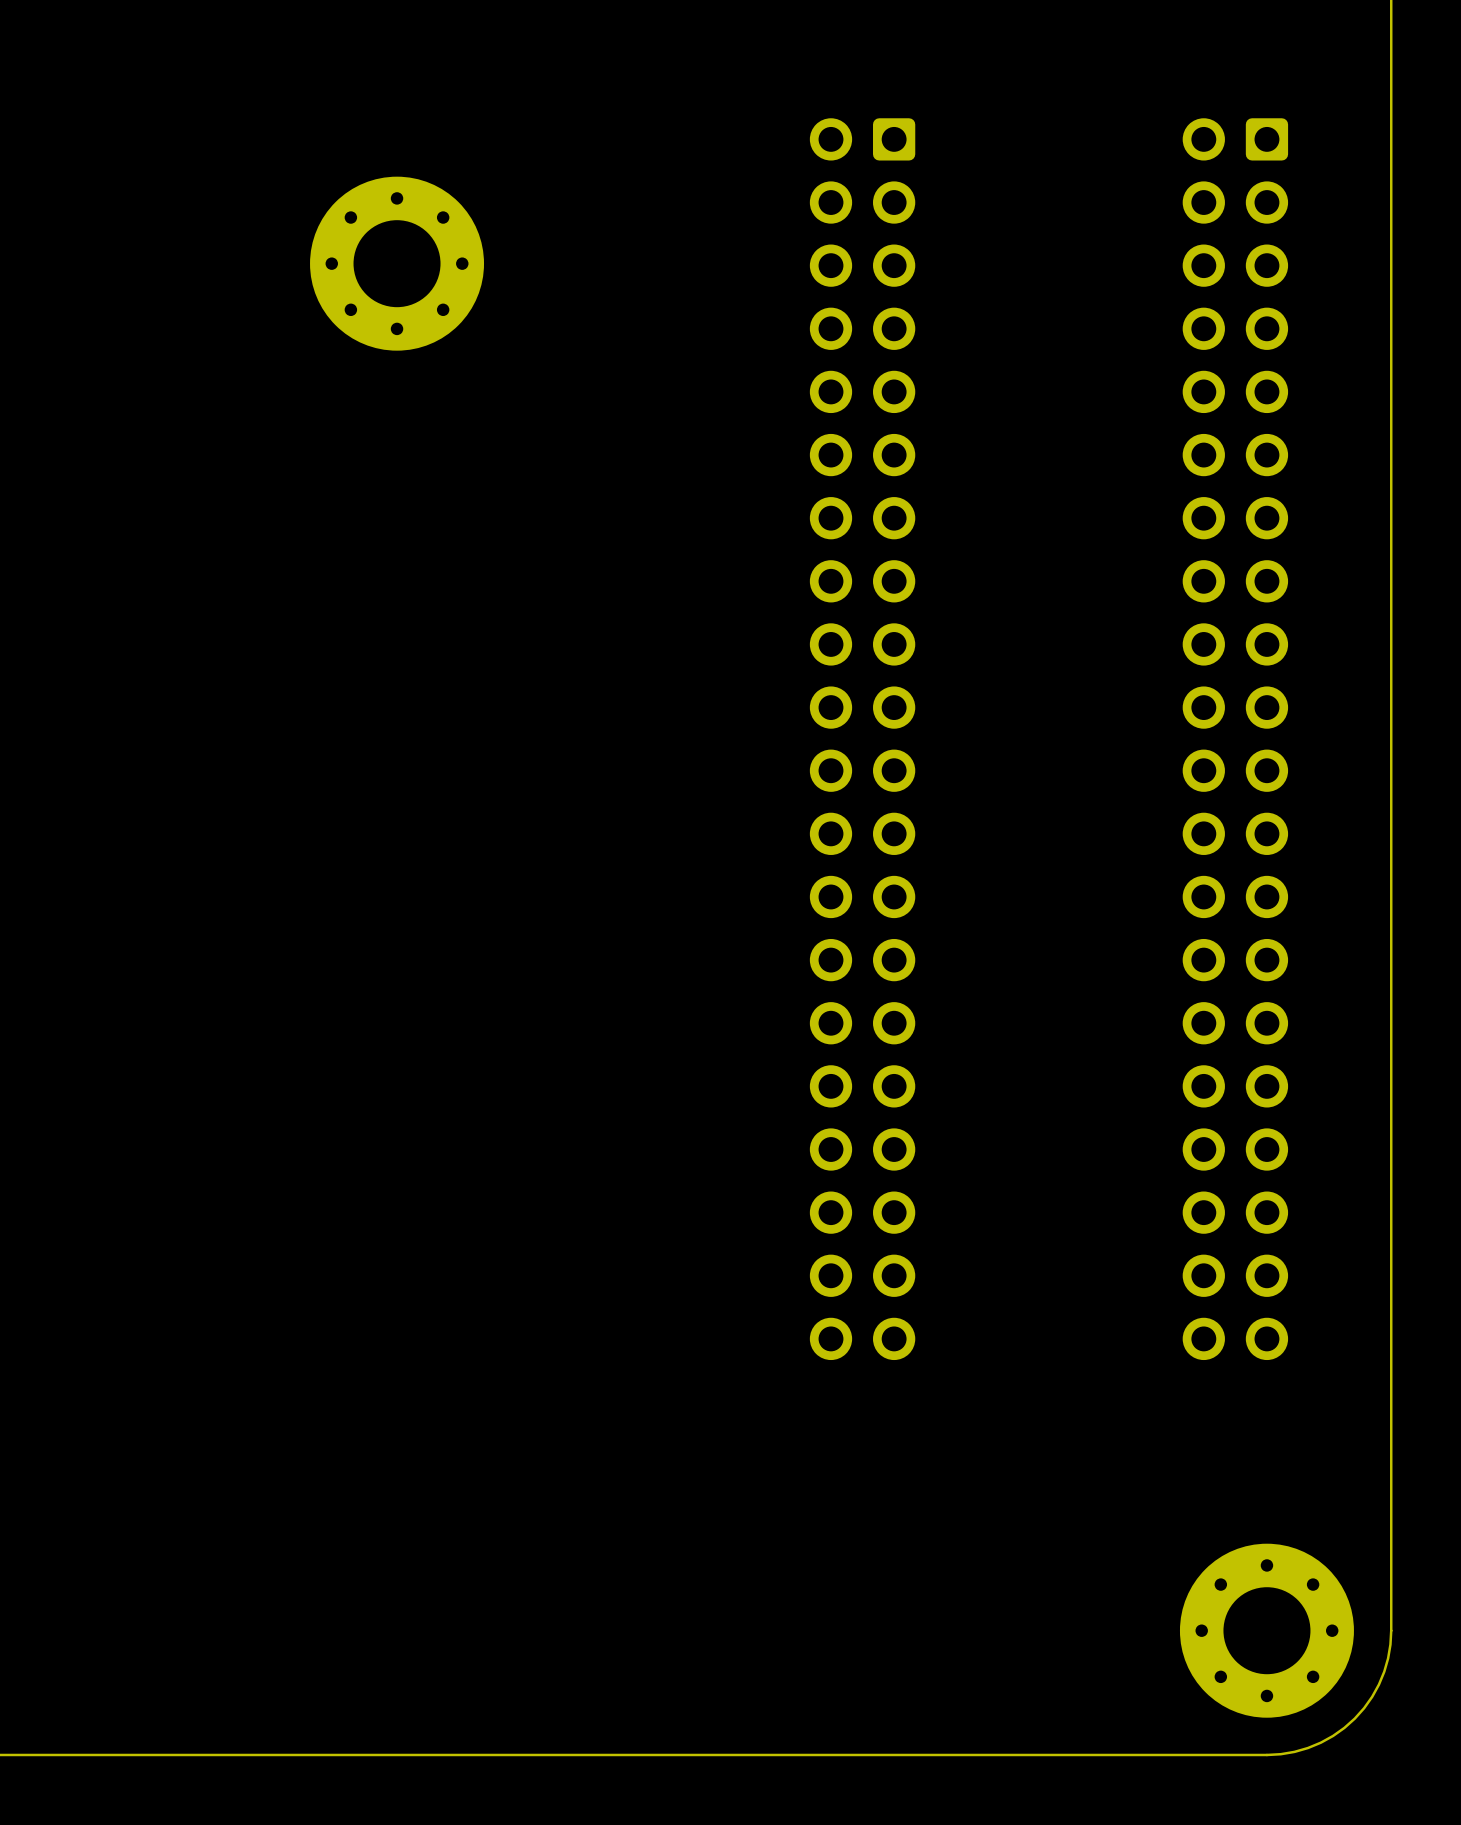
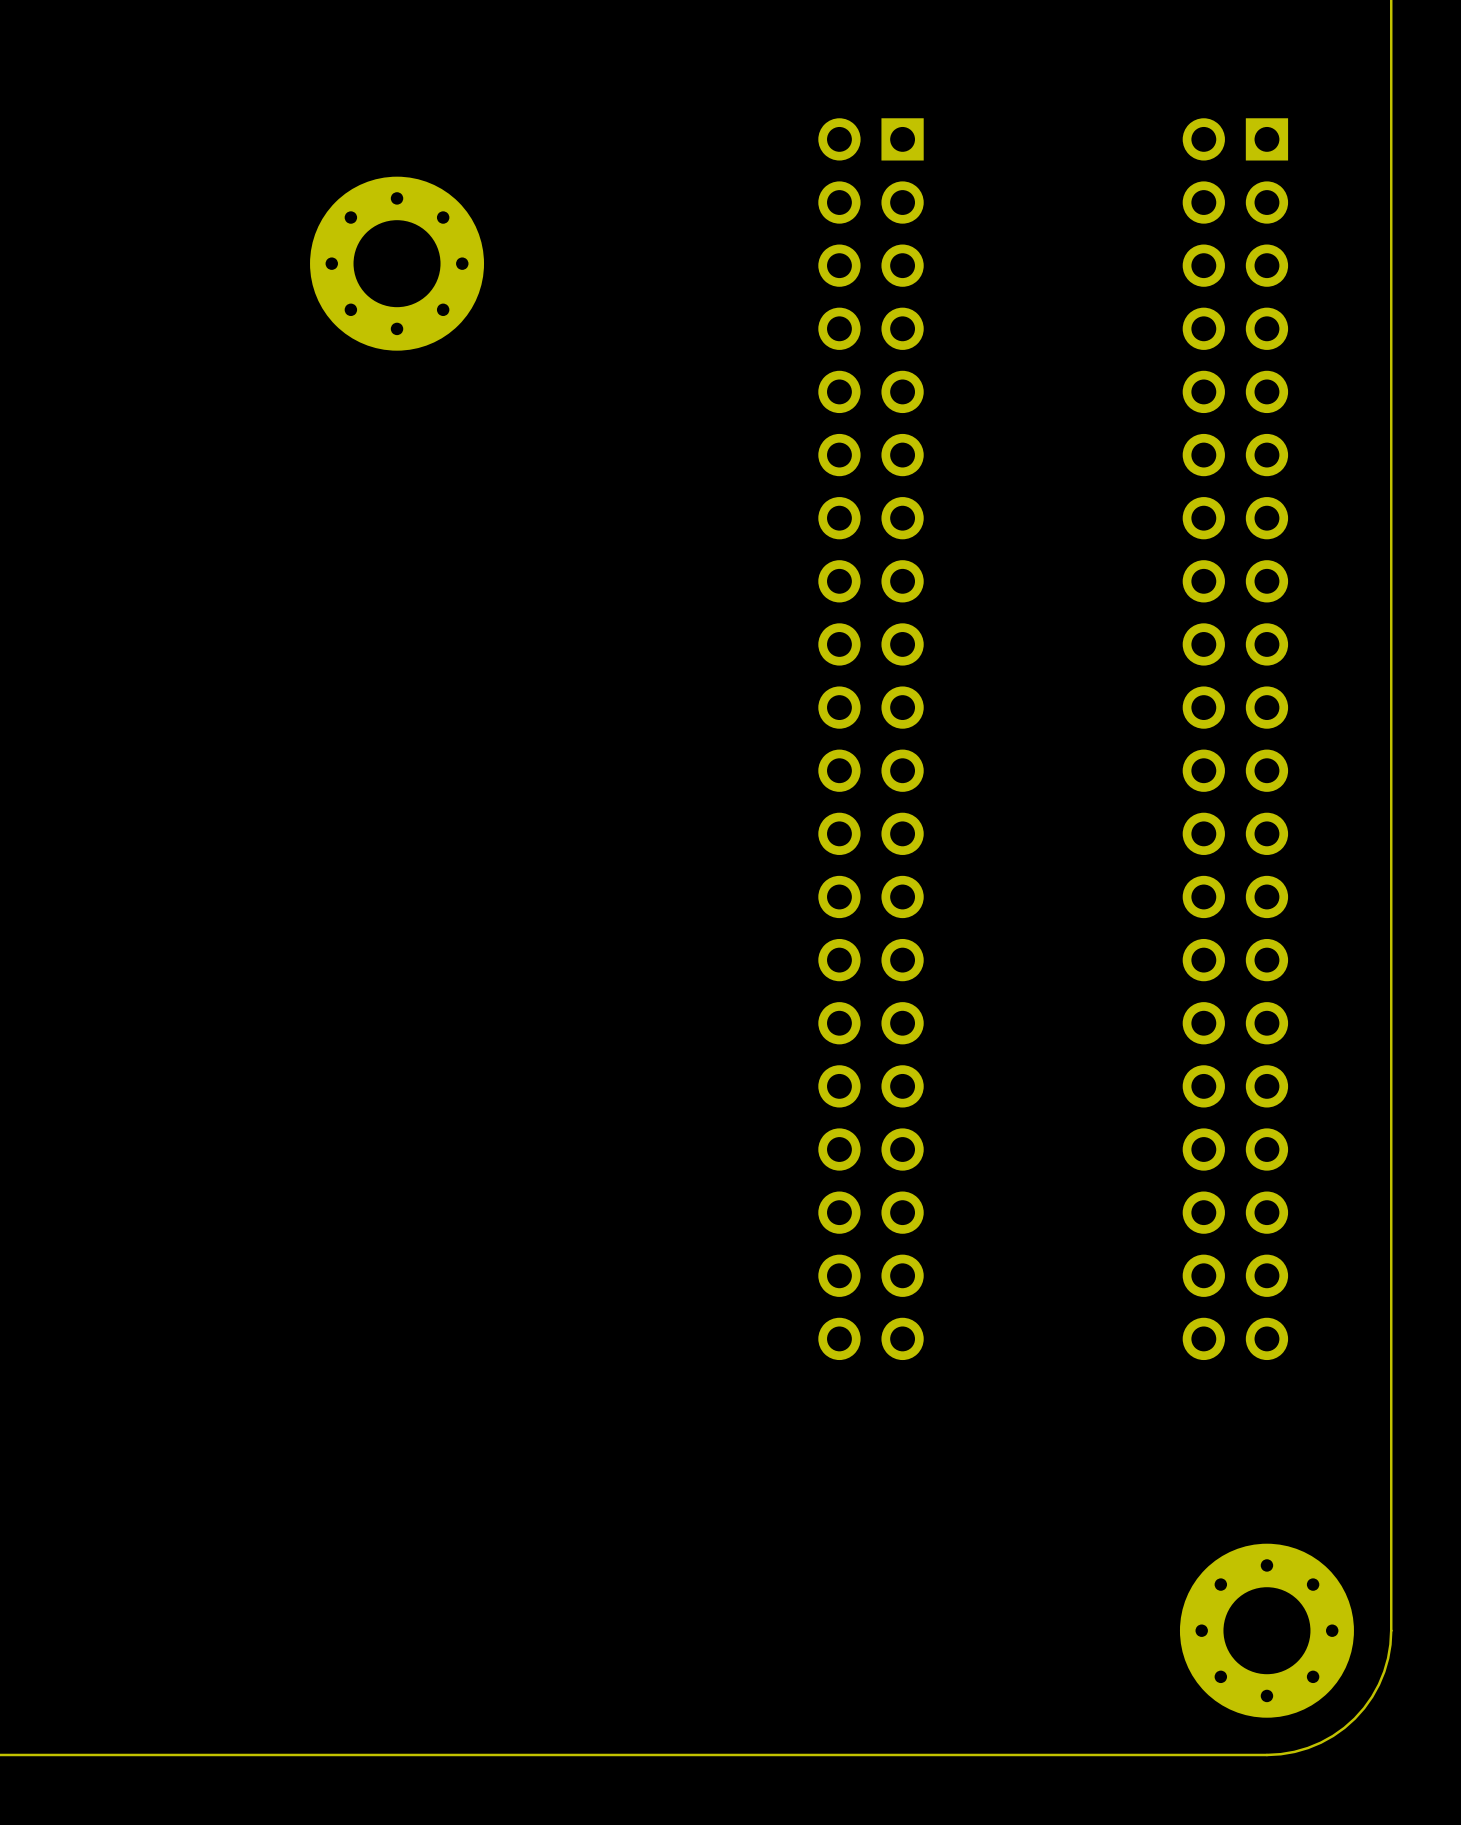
part footprint: [809, 118, 916, 1361] -> [818, 118, 924, 1361]
part footprint: [1182, 118, 1289, 1361] -> [1182, 118, 1289, 1361]

